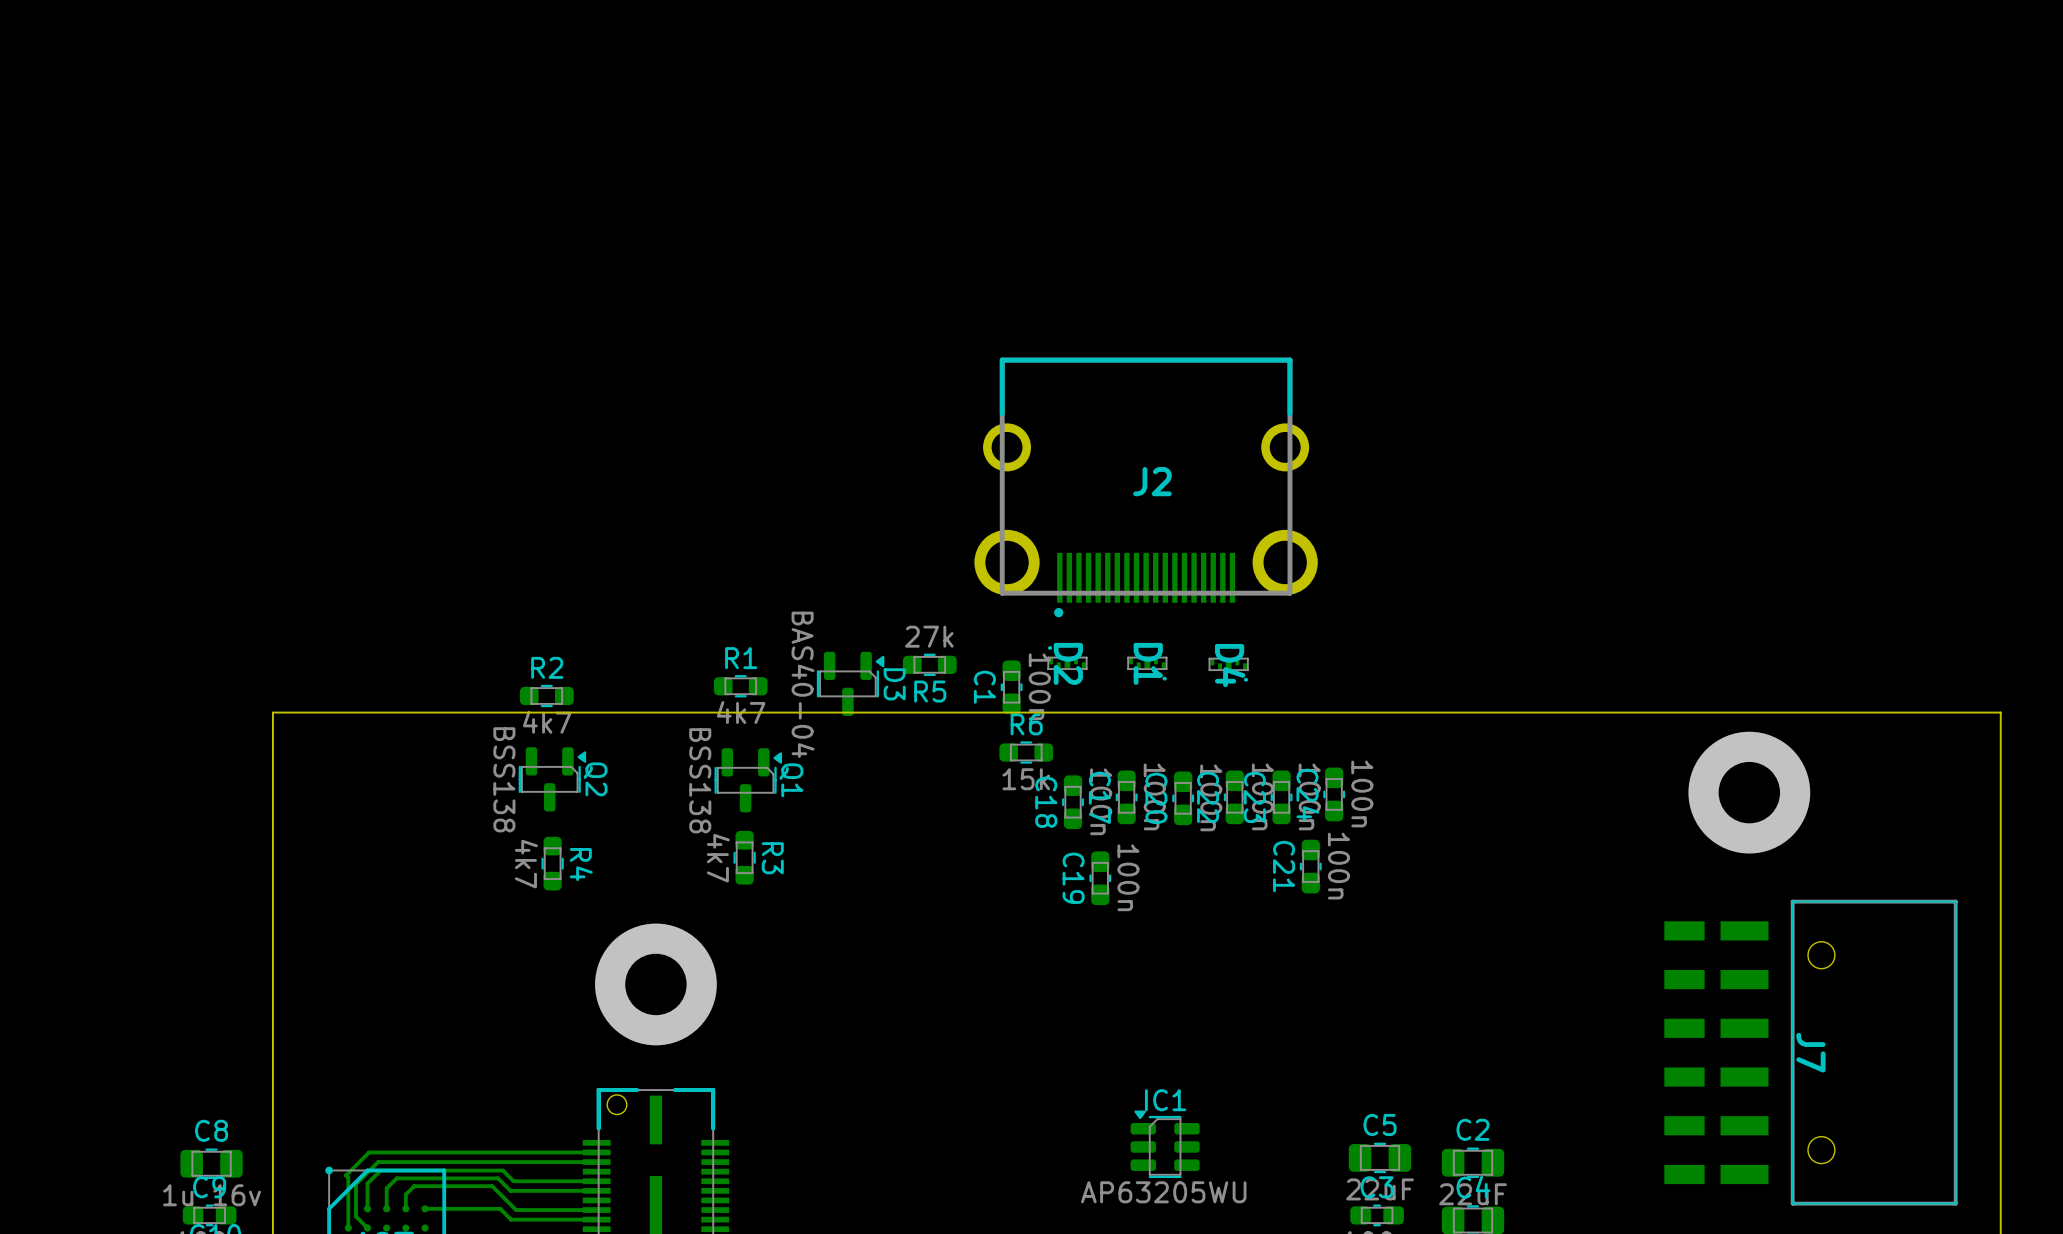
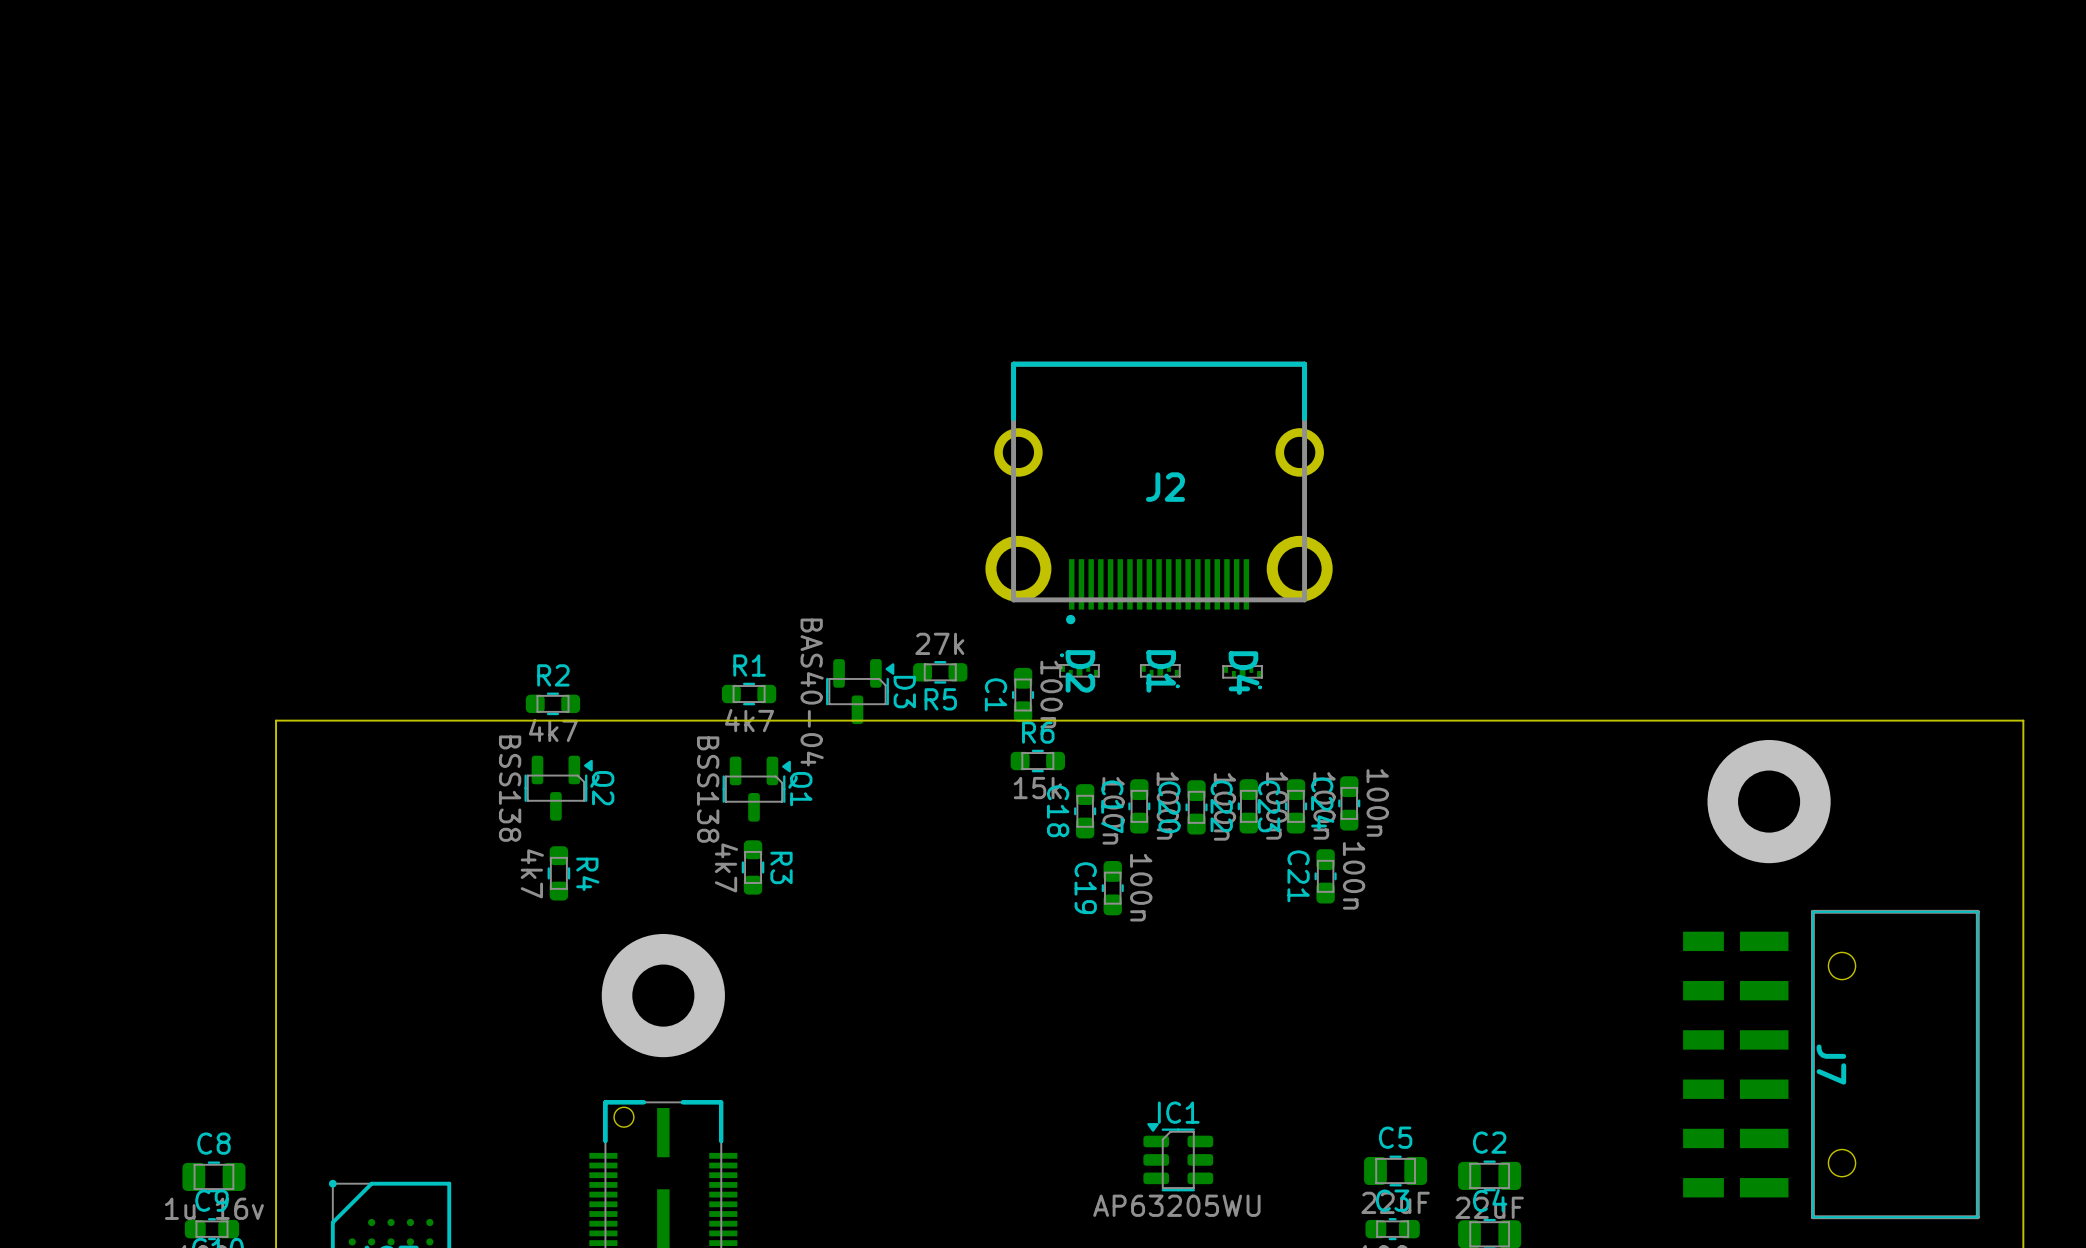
bottom track: (596, 1152) (369, 1152) (346, 1175) (348, 1177) (348, 1228) -> none
bottom track: (596, 1162) (378, 1162) (355, 1184) (355, 1216) (367, 1228) -> none
bottom track: (596, 1181) (513, 1181) (502, 1170) (380, 1170) (367, 1183) (367, 1208) -> none
bottom track: (596, 1190) (510, 1190) (498, 1178) (396, 1178) (386, 1188) (386, 1208) -> none
bottom track: (405, 1208) (405, 1194) (414, 1186) (492, 1186) (516, 1210) (596, 1210) -> none
bottom track: (425, 1208) (500, 1208) (511, 1219) (596, 1219) -> none

